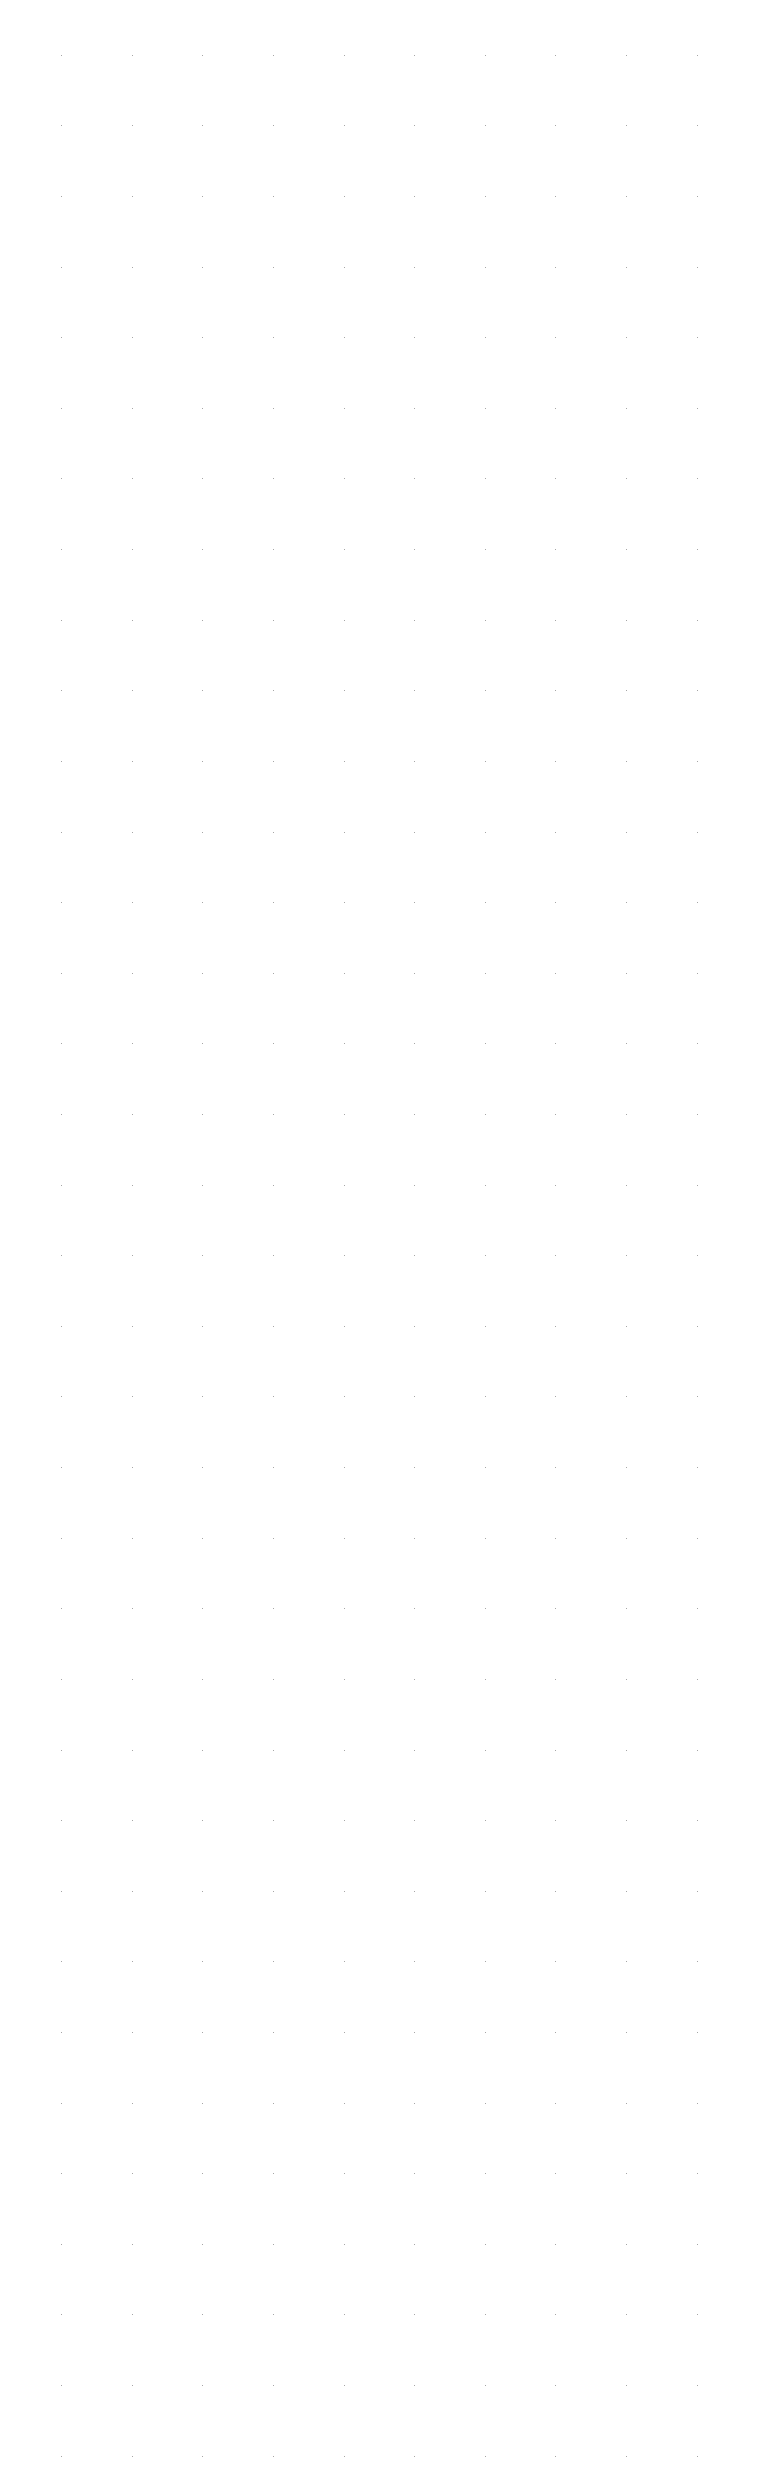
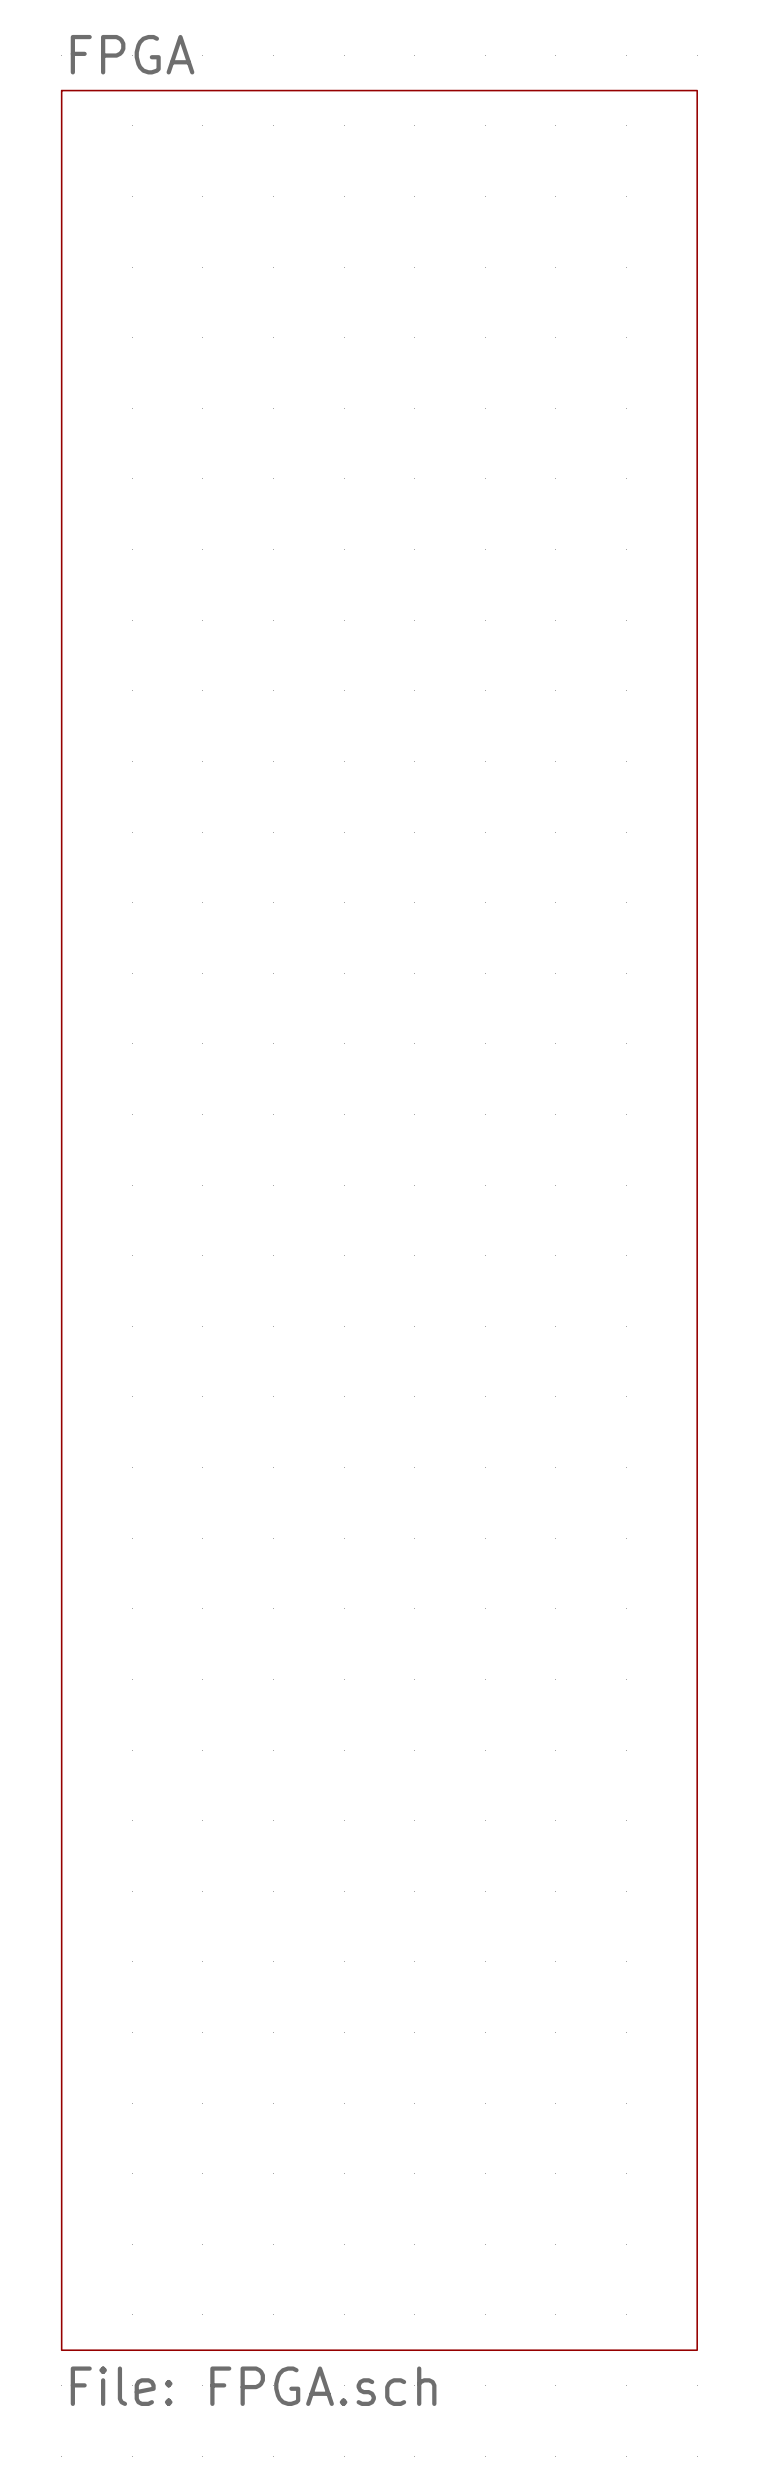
sheet FPGA: none -> File: FPGA.sch (379, 1220)

